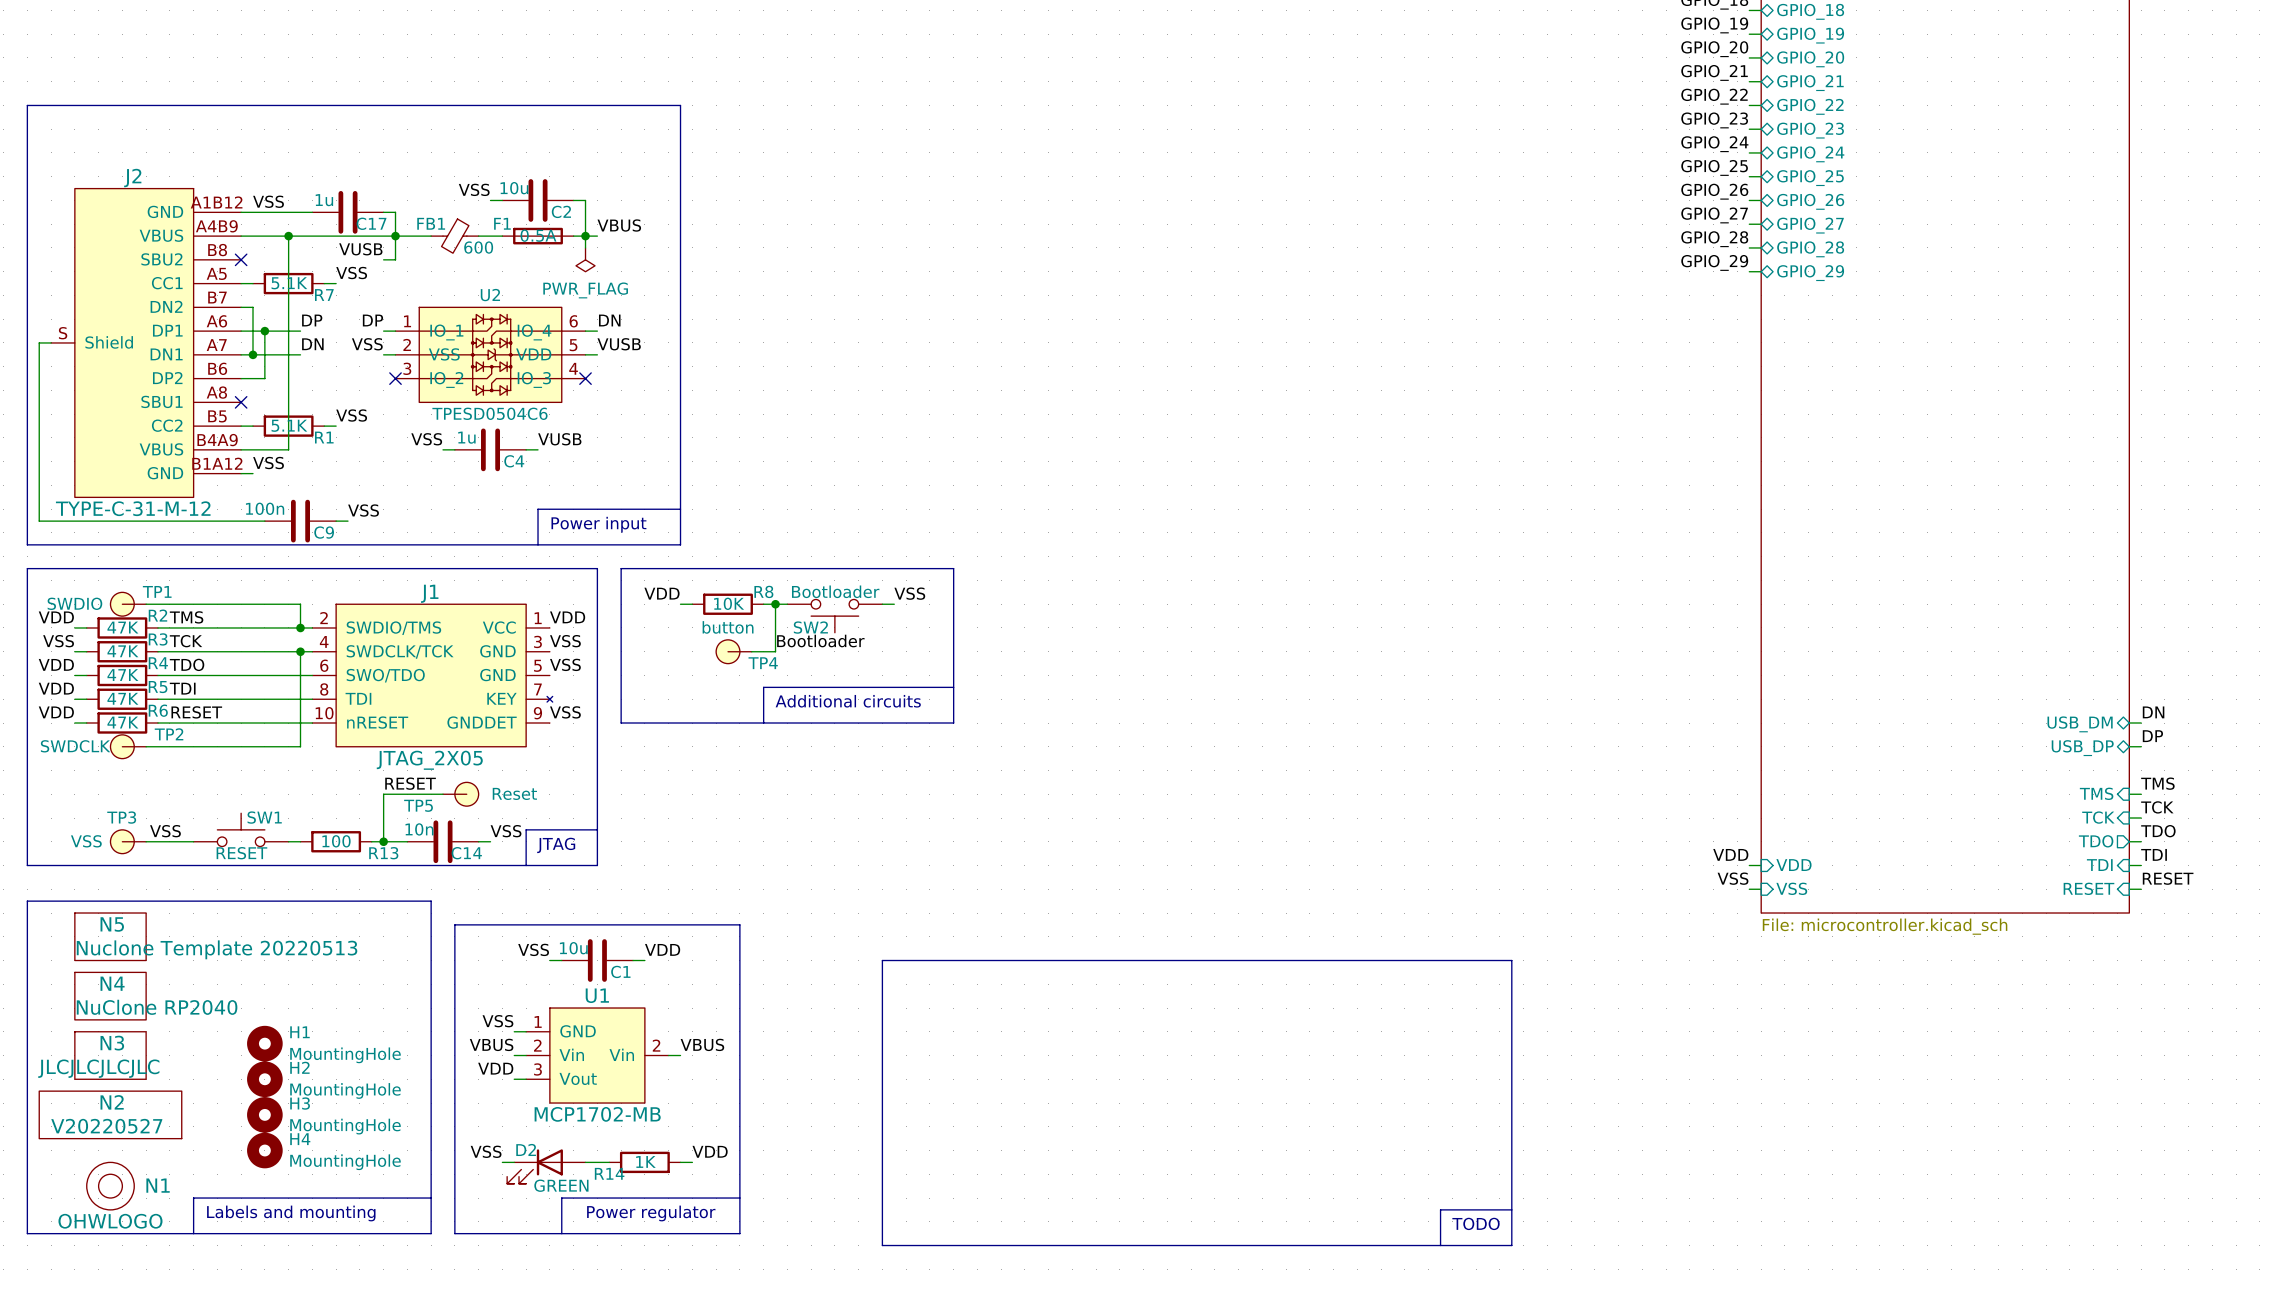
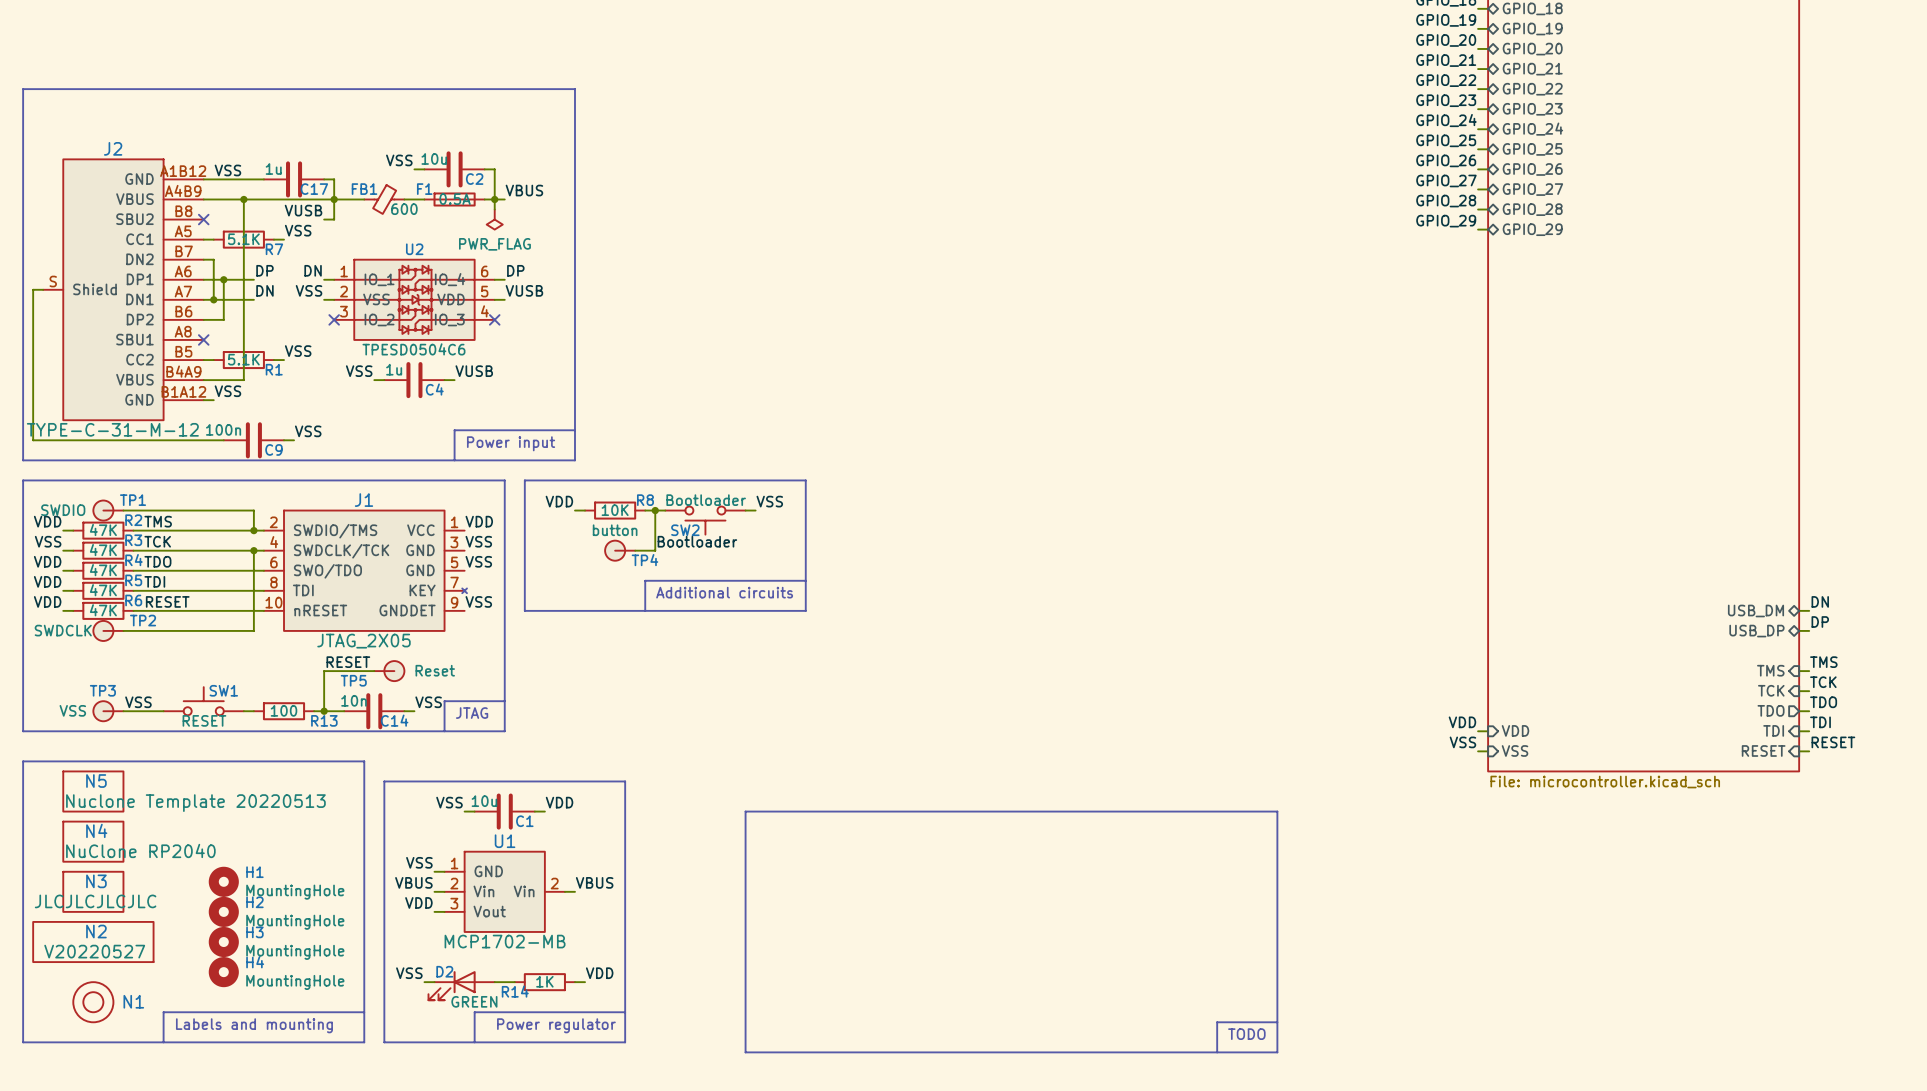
label: DP (372, 320) -> DN (313, 270)
label: DN (609, 320) -> DP (515, 270)
N1 value: OHWLOGO (110, 1221) -> none

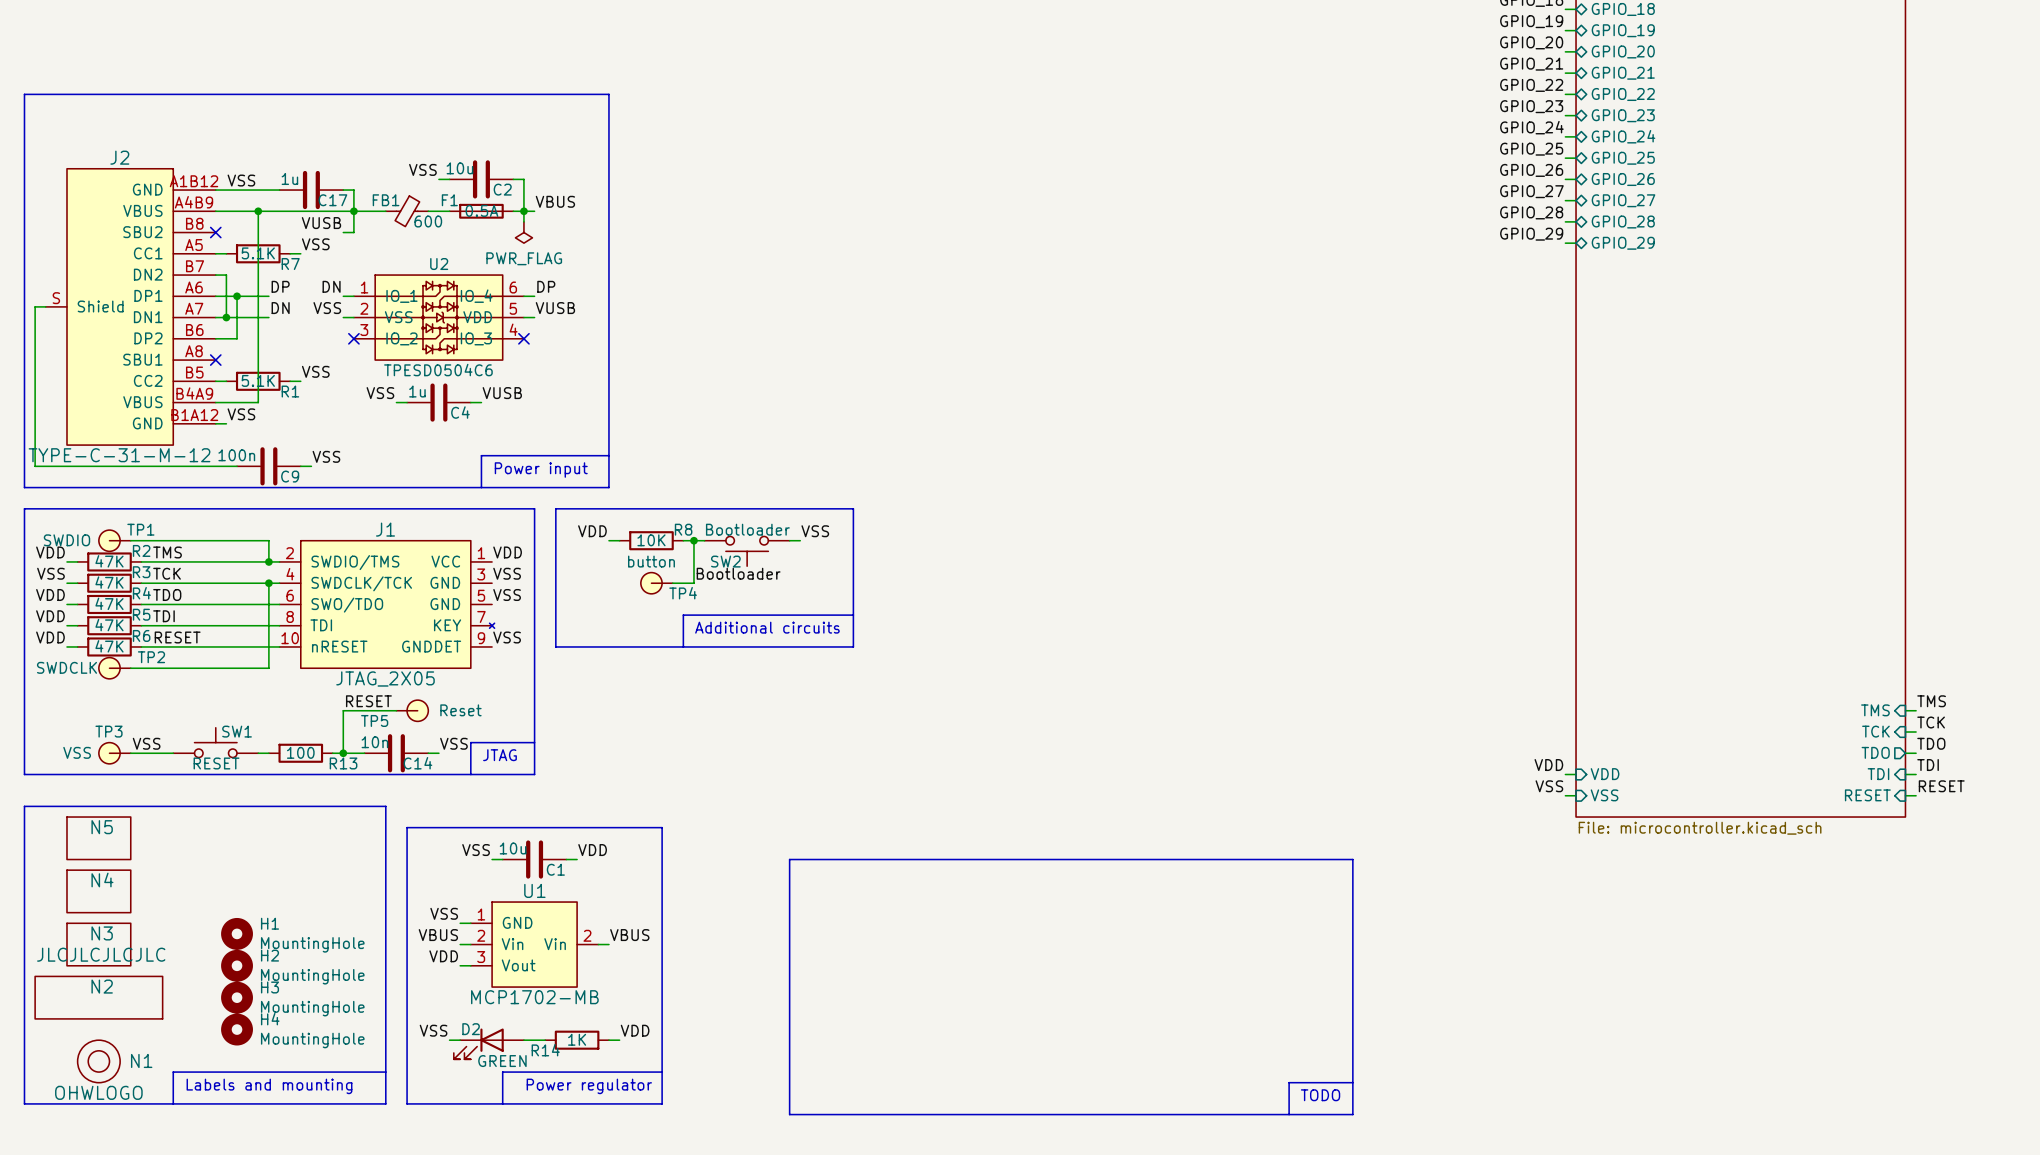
label: DN (1820, 601) -> none
sheet pin: USB_DM (1755, 610) -> none
wire: (1799, 610) (1809, 610) -> none
label: DP (1820, 622) -> none
wire: (1799, 630) (1809, 630) -> none
sheet pin: USB_DP (1756, 631) -> none
N5 value: Nuclone Template 20220513 (195, 803) -> none
N4 value: NuClone RP2040 (140, 850) -> none
N2 value: V20220527 (94, 951) -> none
N1 value: none -> OHWLOGO (98, 1092)

